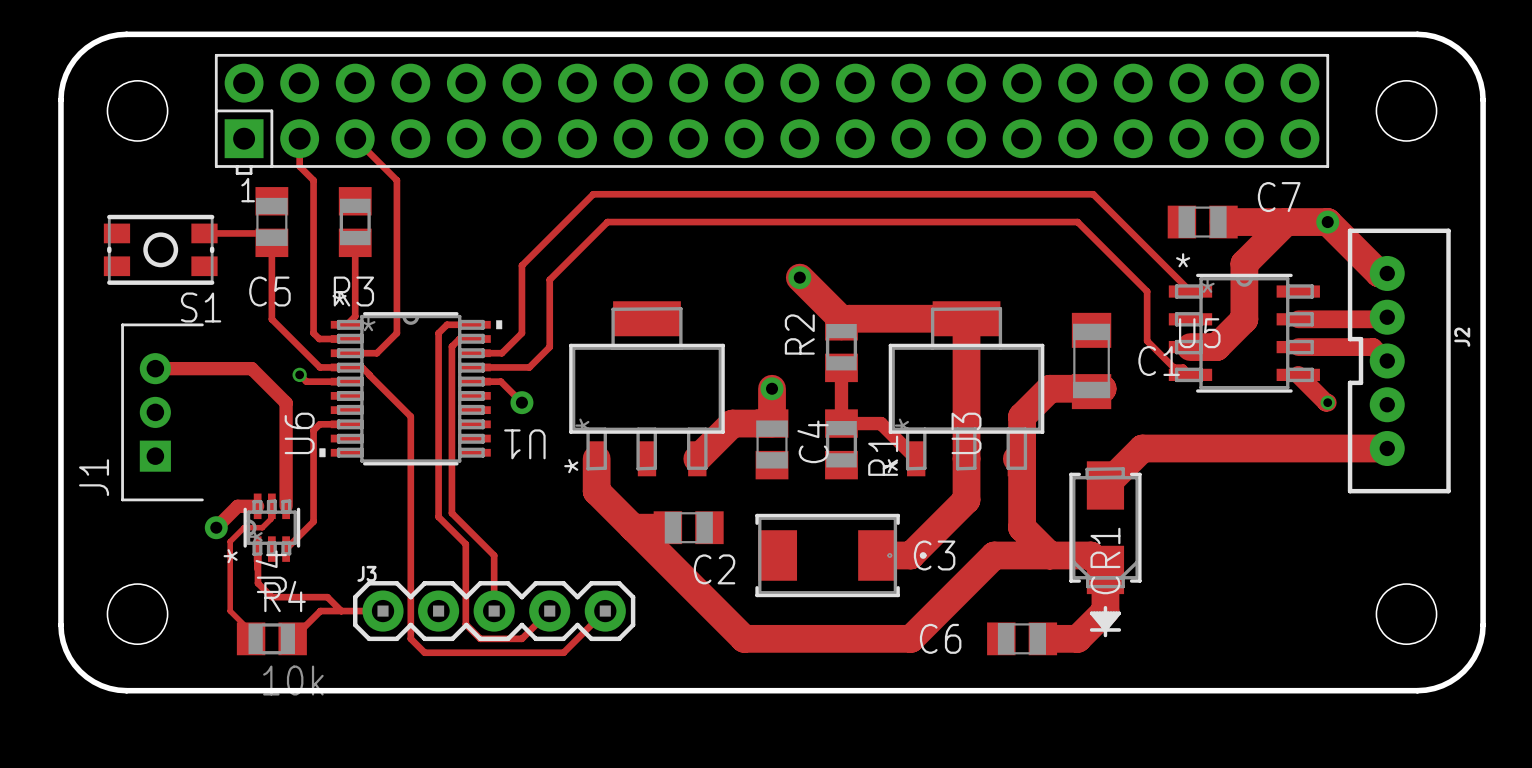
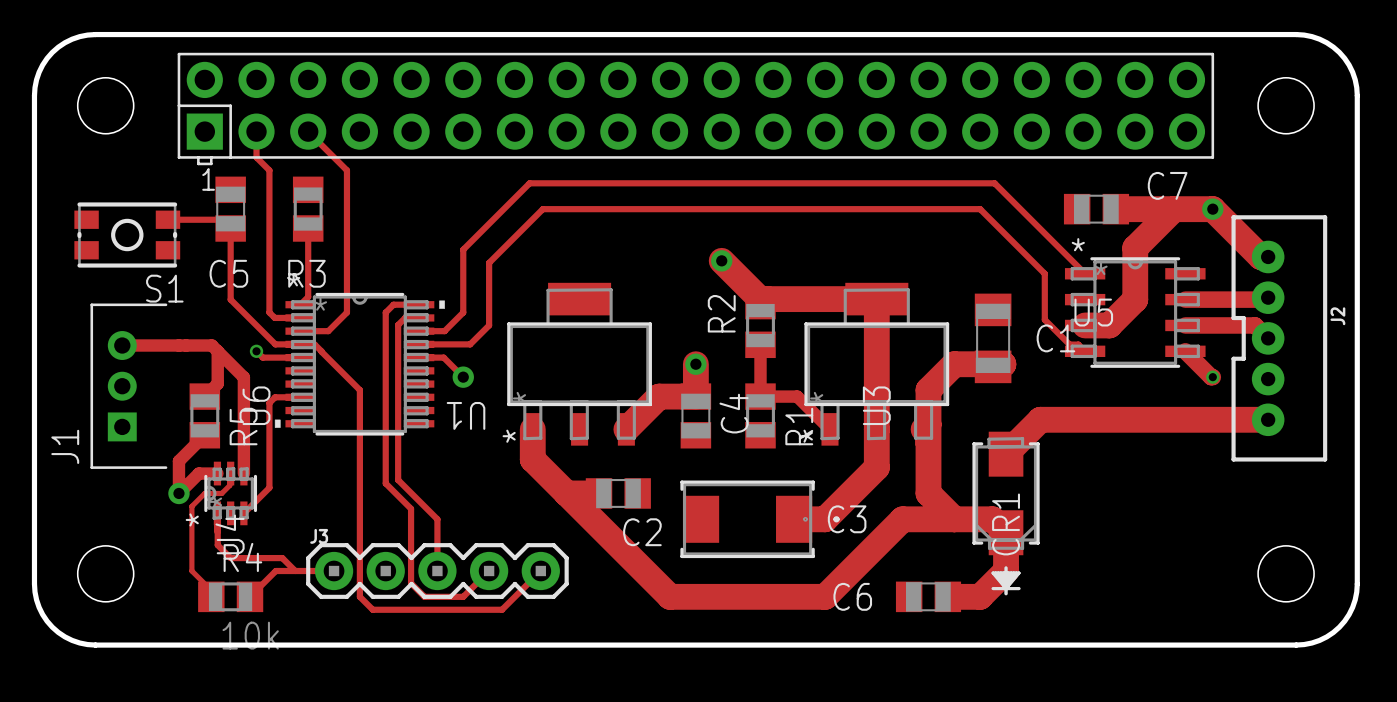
track: none -> (217, 351) (217, 383) (204, 396)
R5: none -> (204, 415)
track: none -> (204, 435) (178, 461) (178, 493)

